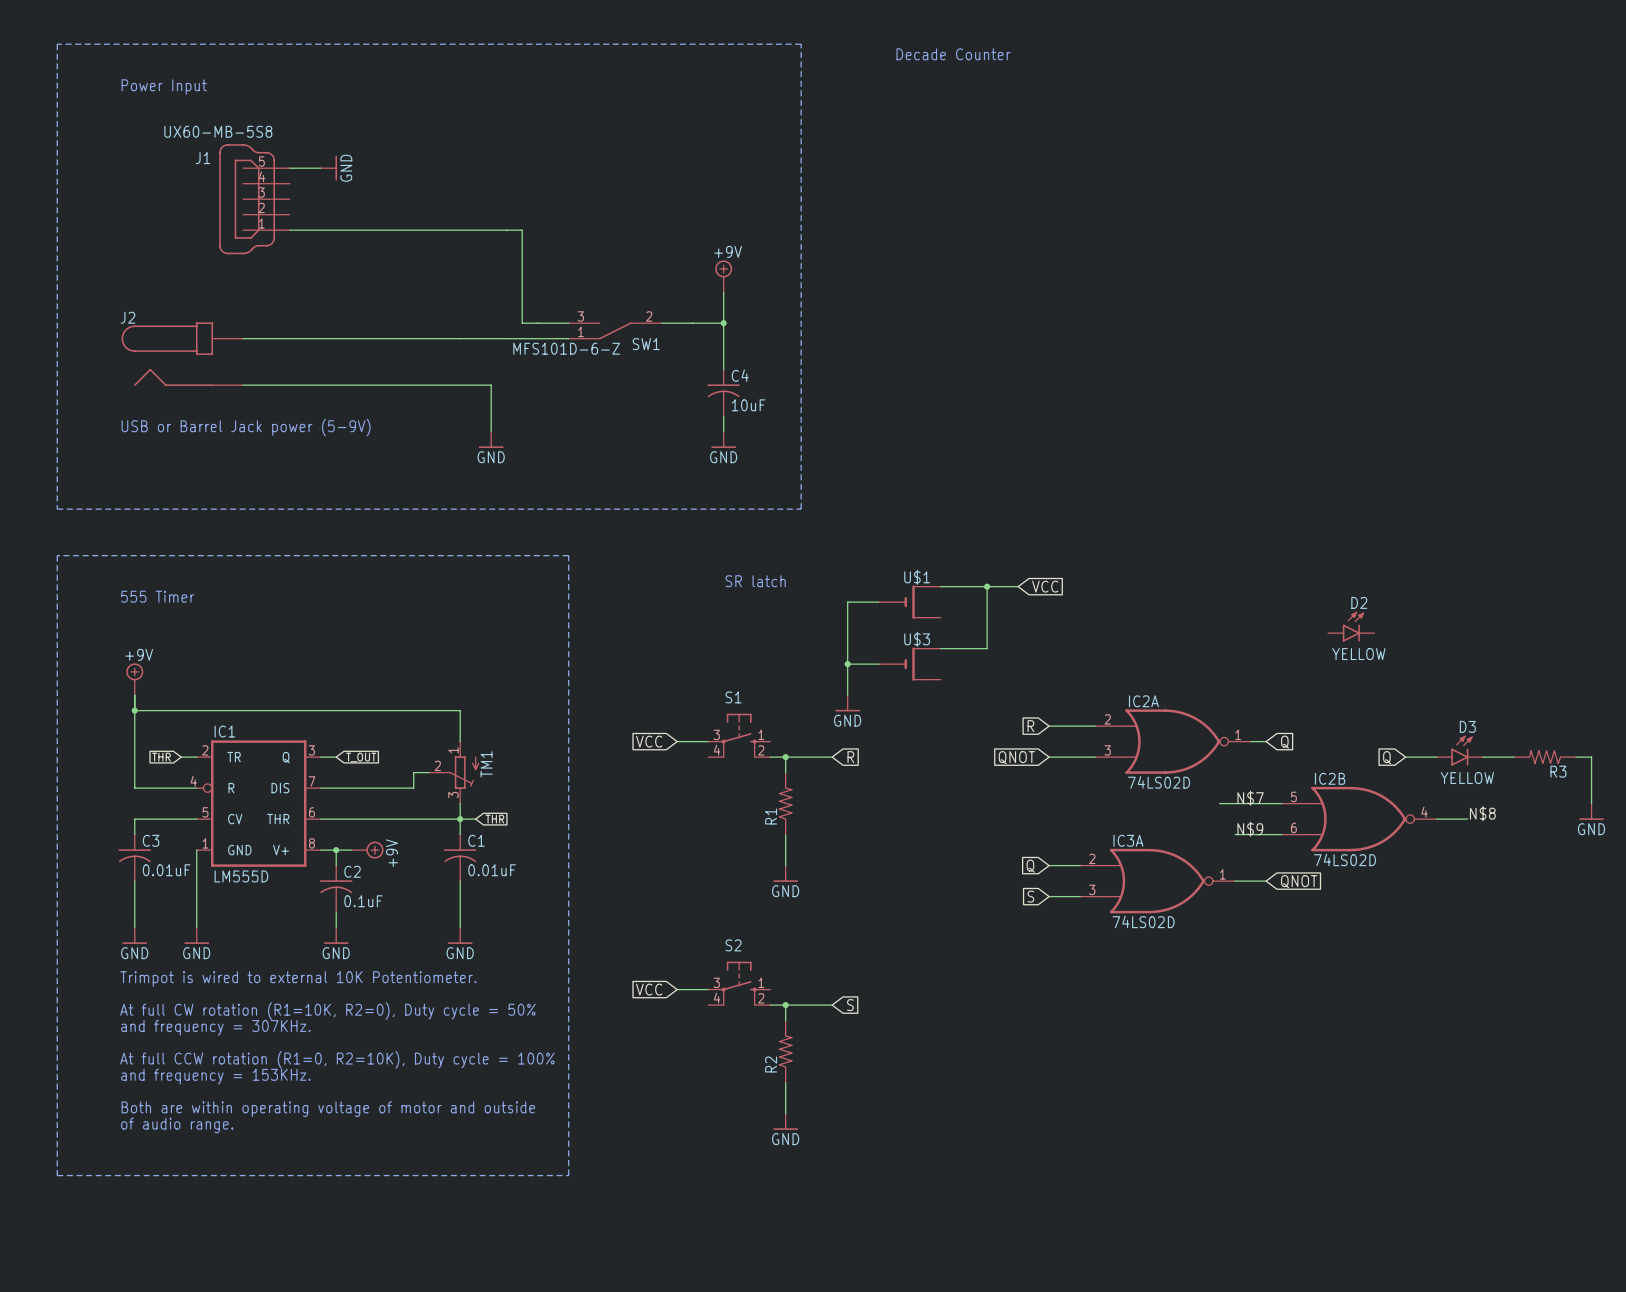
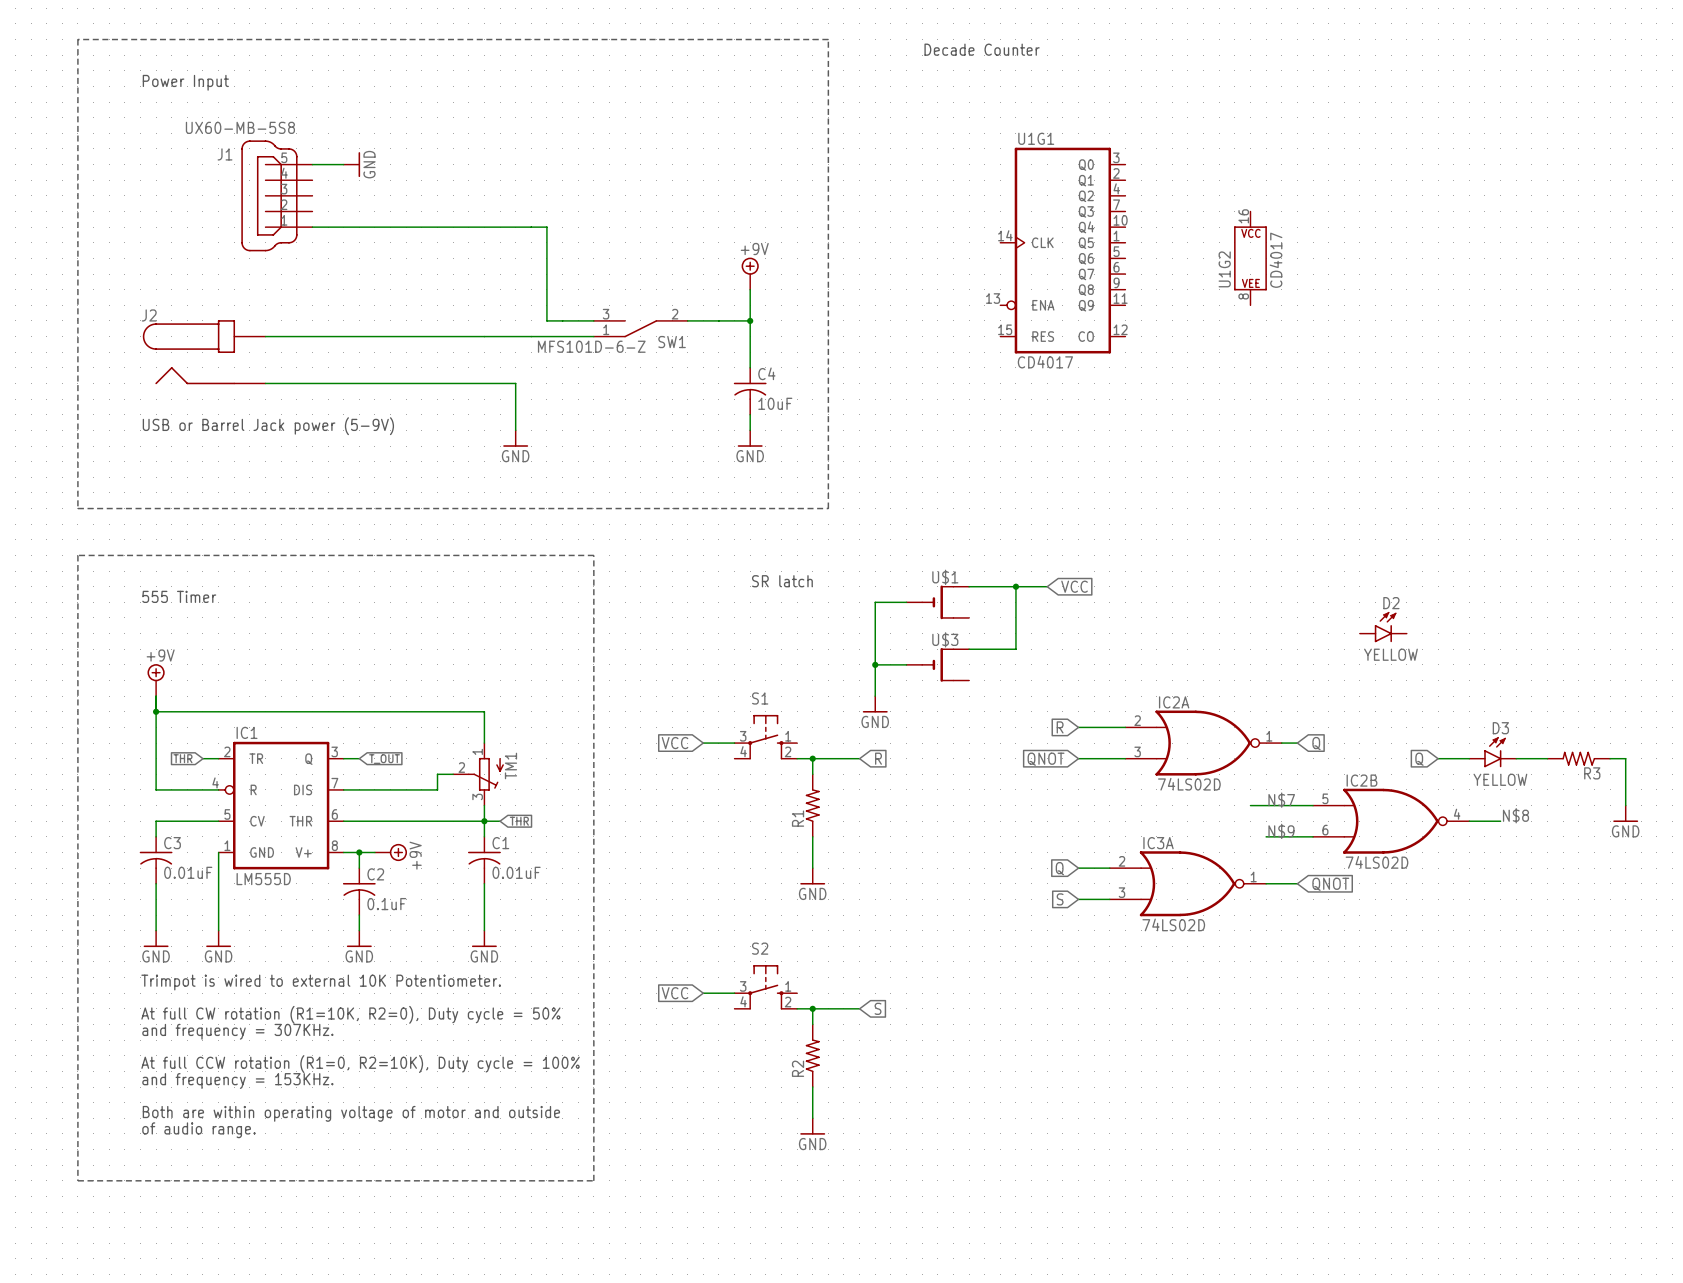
U1G1: none -> CD4017 (1062, 250)
U1G2: none -> CD4017 (1250, 258)

